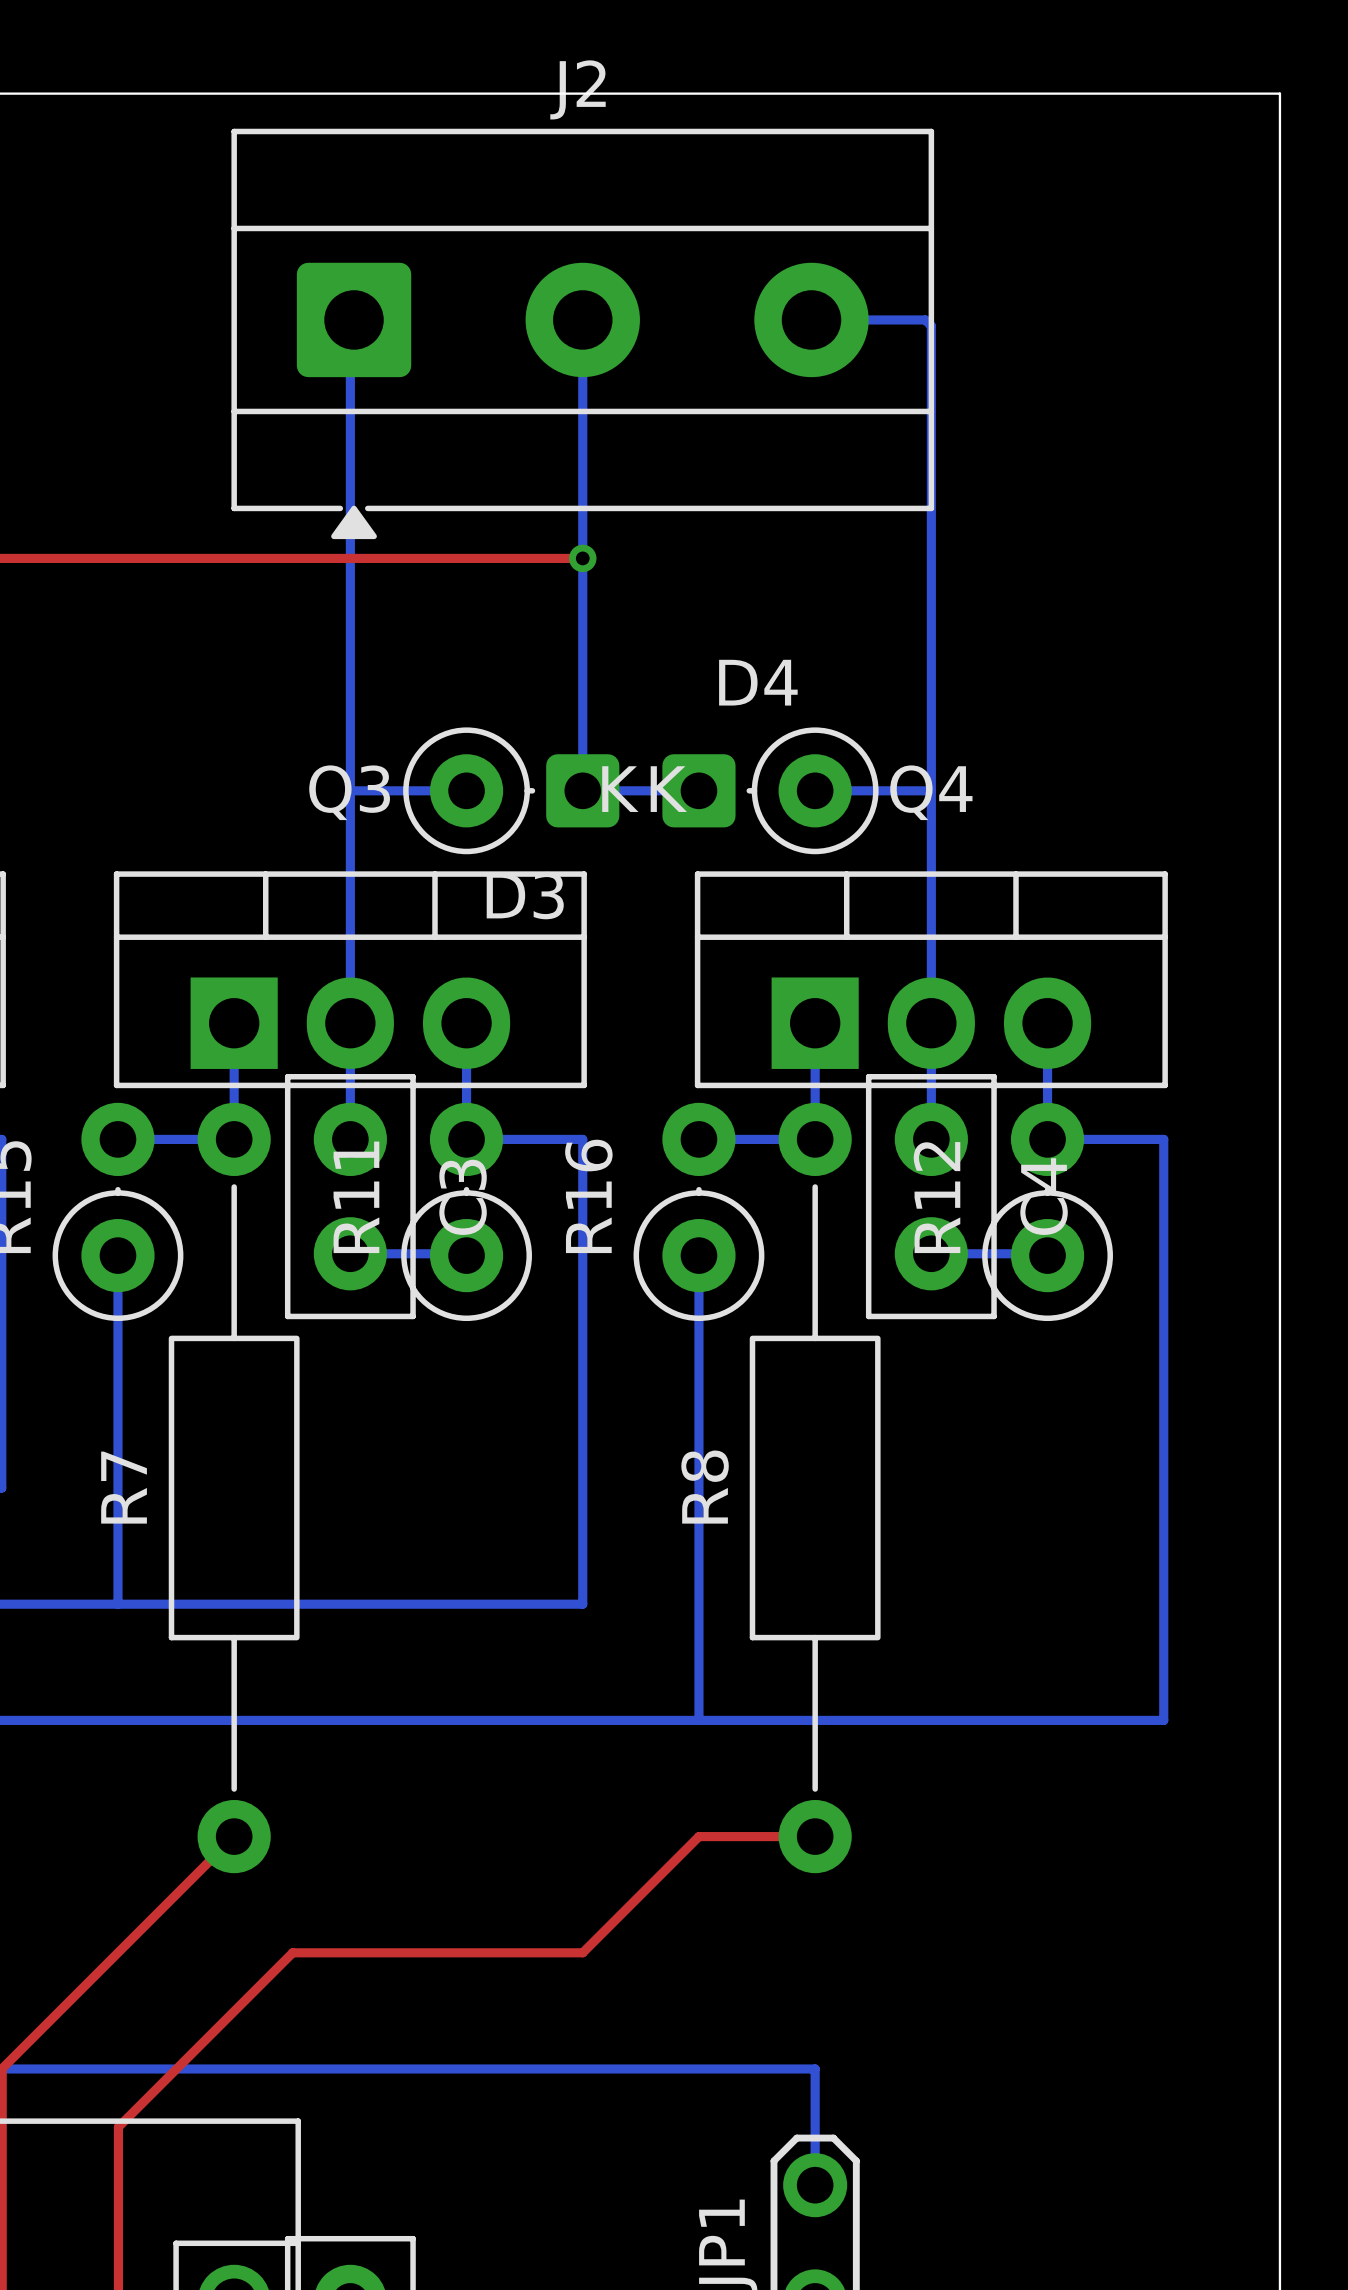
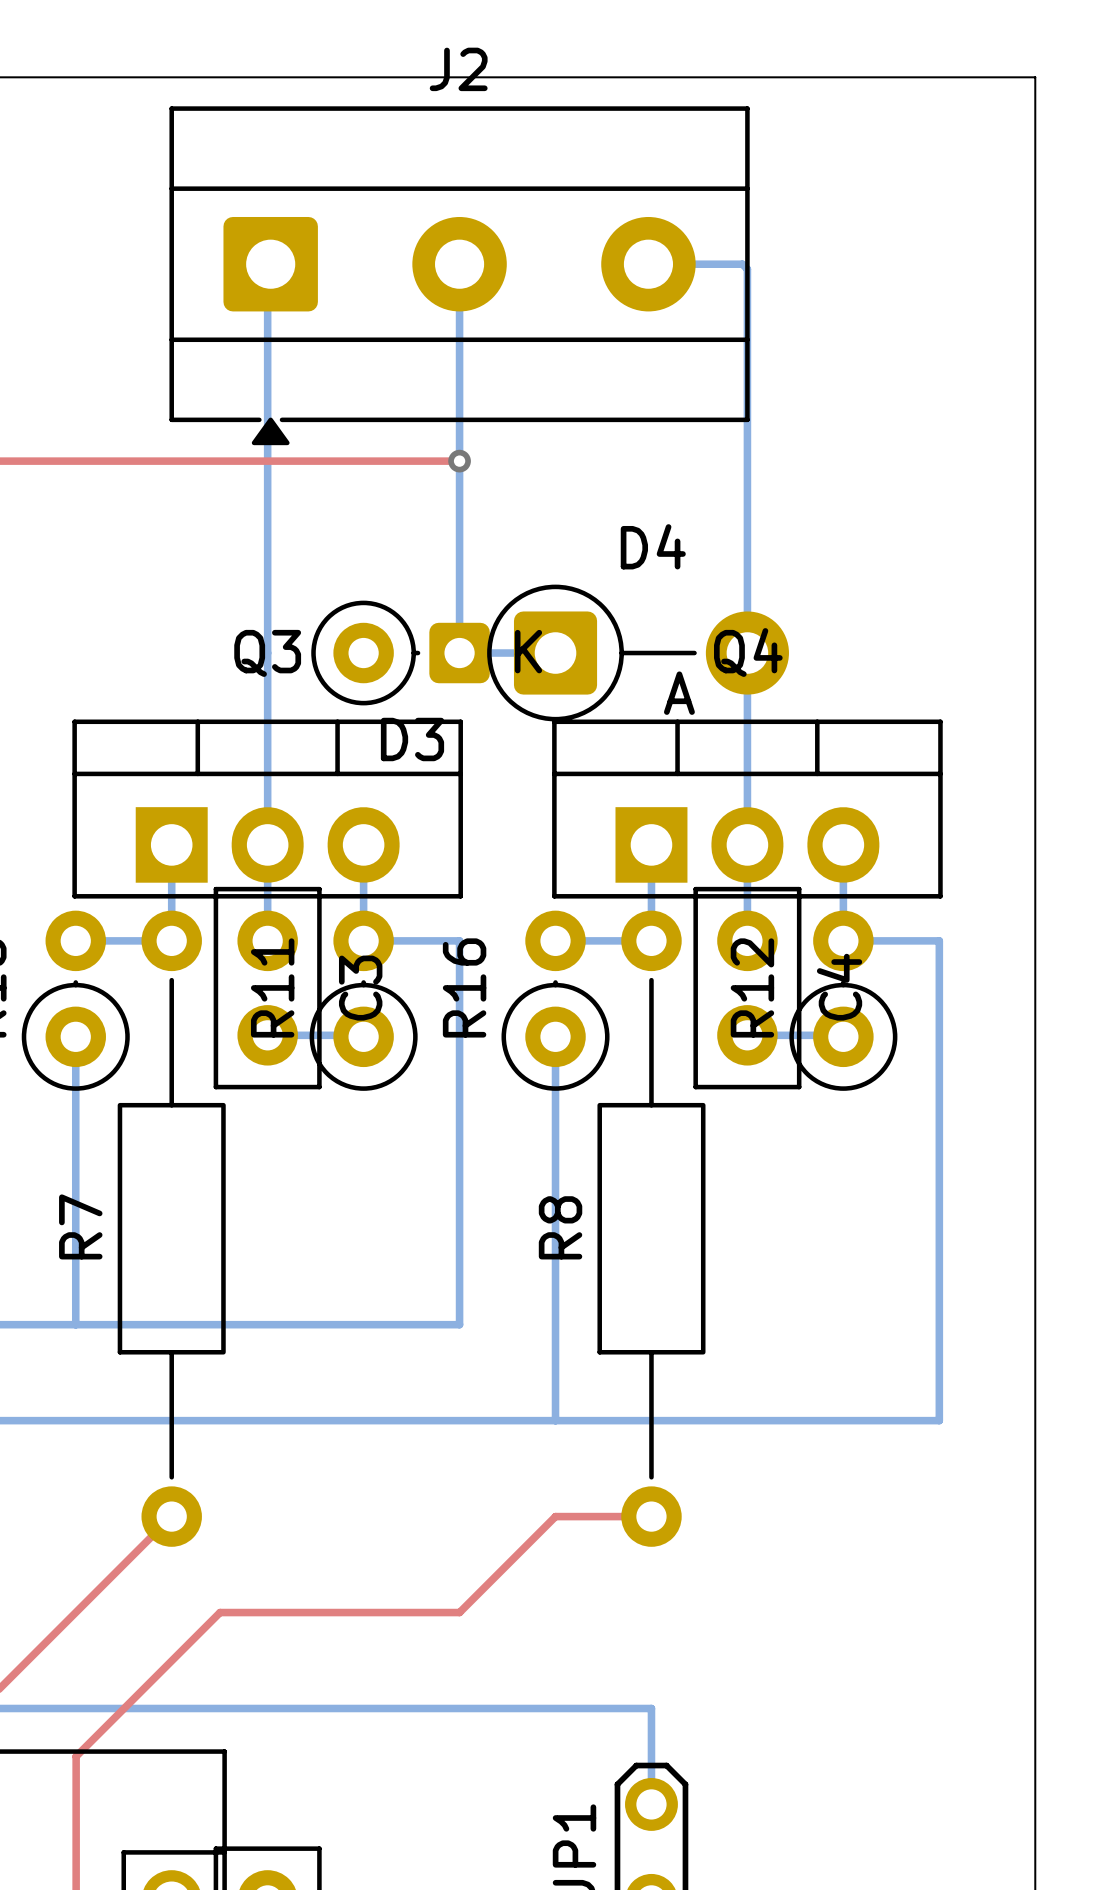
D4 footprint: [662, 727, 879, 855] -> [487, 584, 789, 722]
bottom track: (350, 790) (466, 790) -> none
bottom track: (815, 790) (931, 790) -> none

